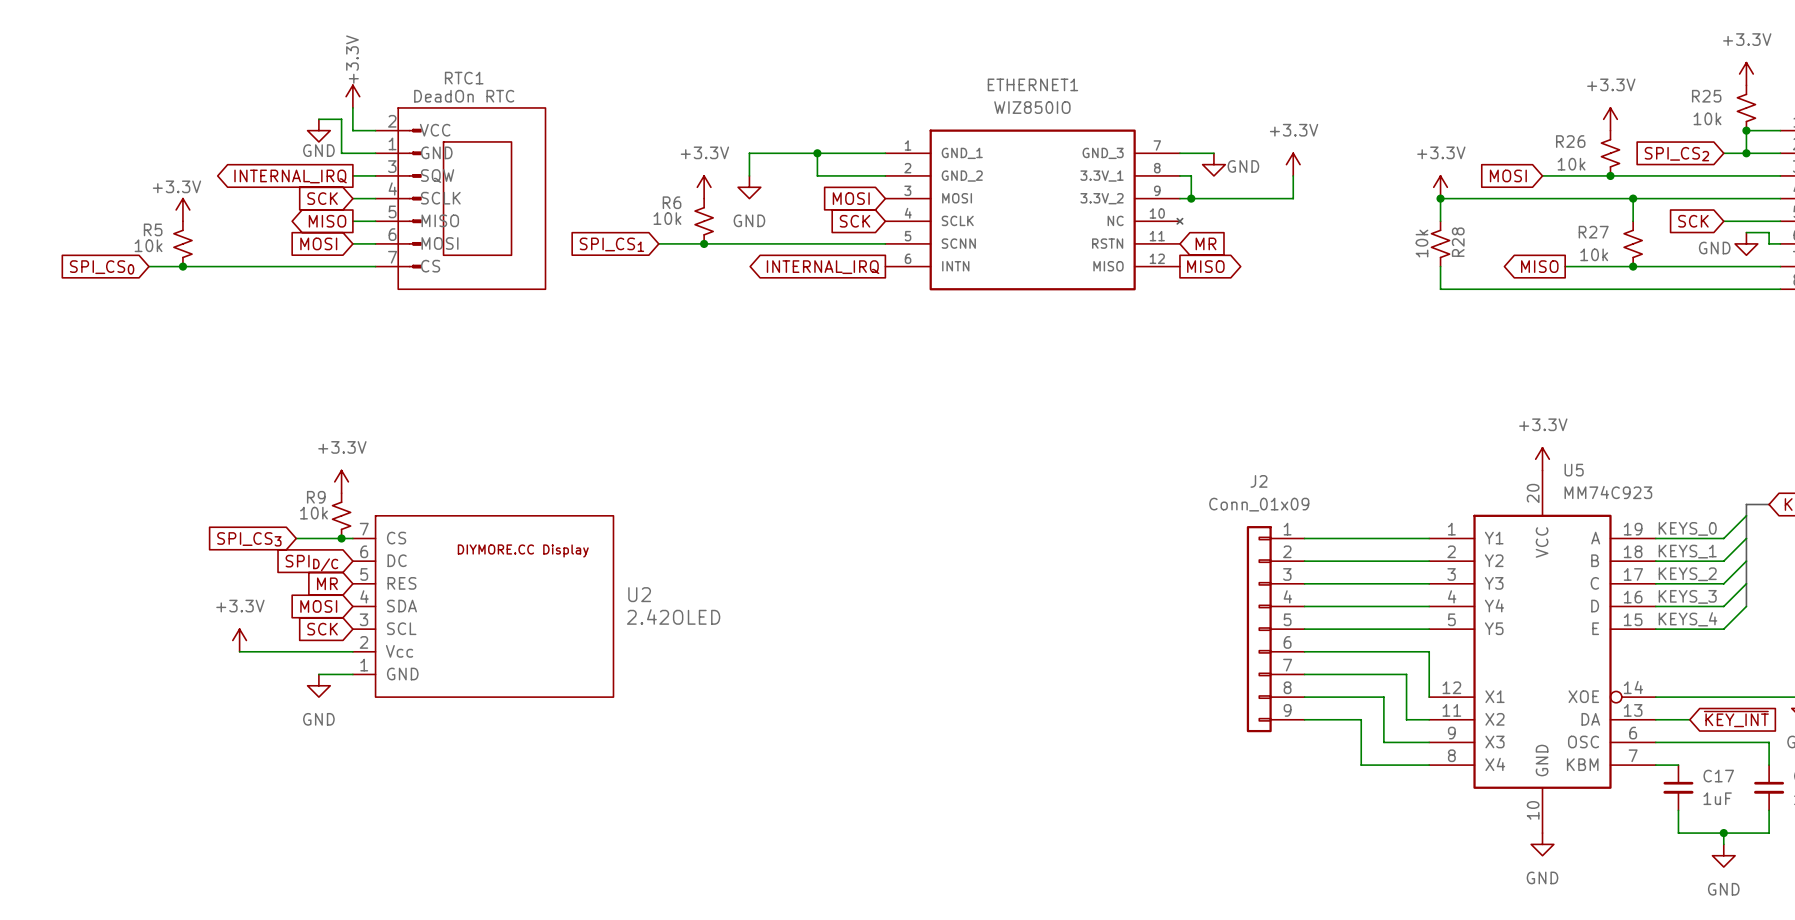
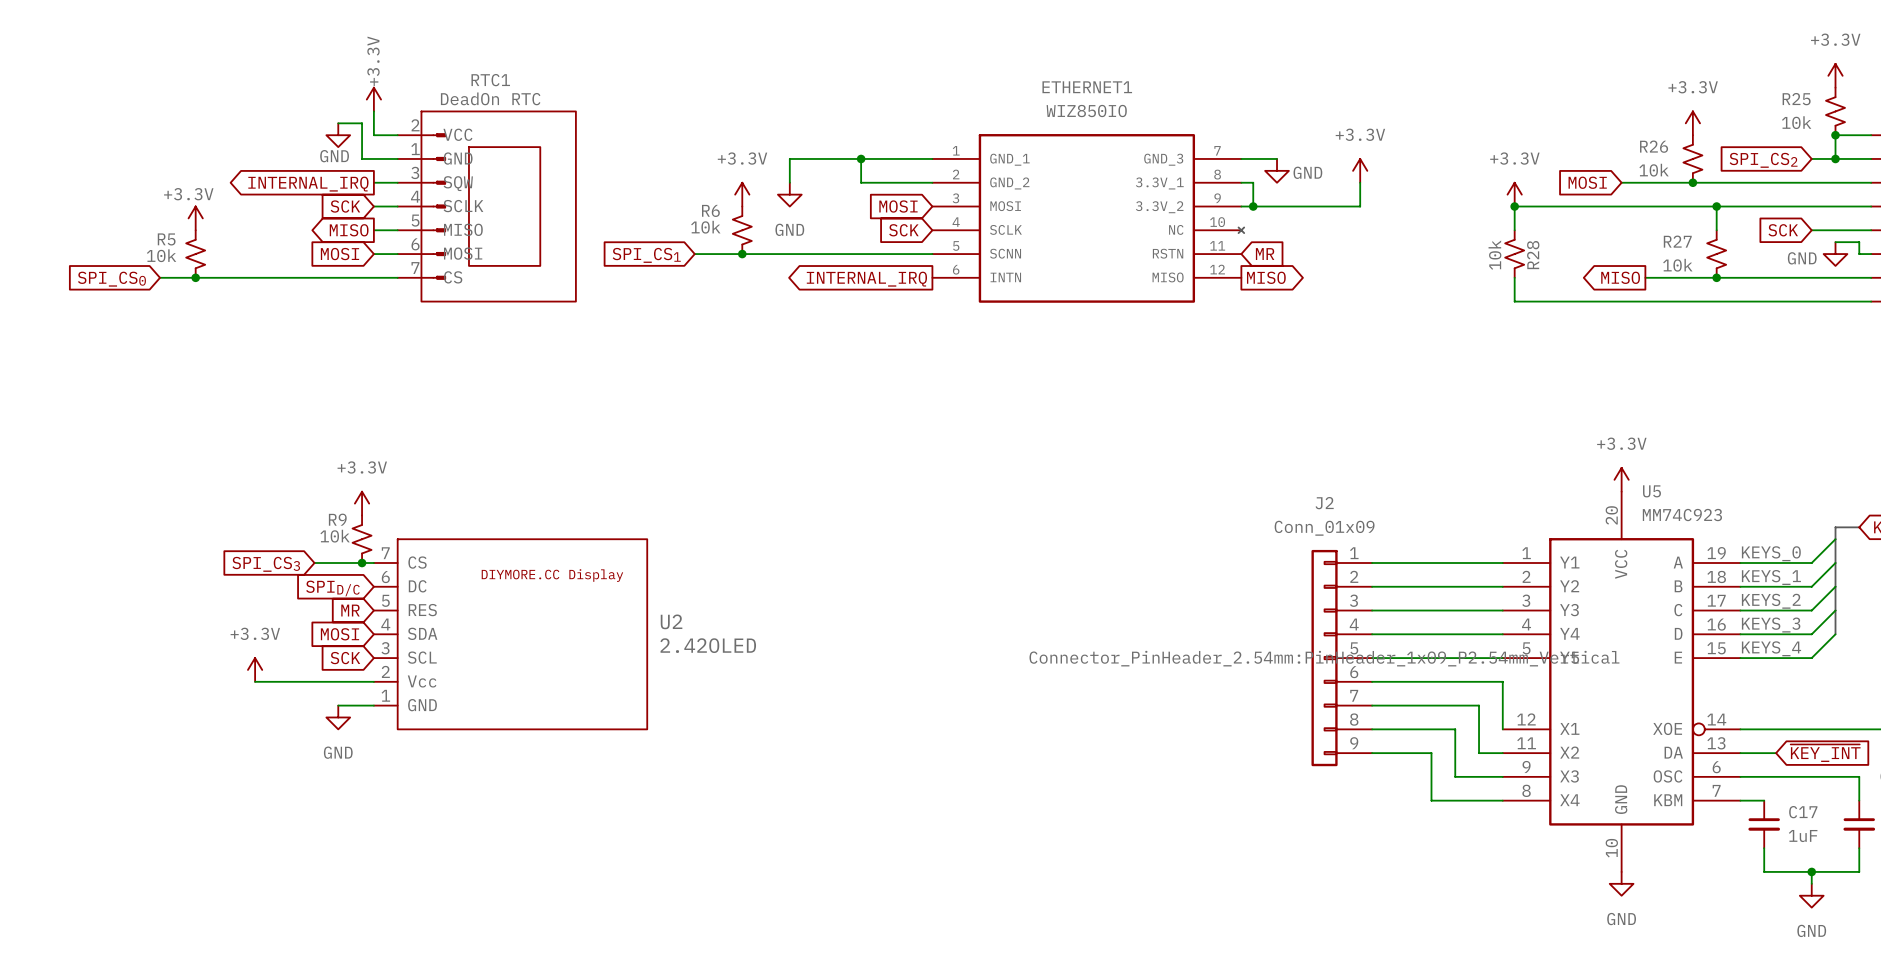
J2 text: none -> Connector_PinHeader_2.54mm:PinHeader_1x09_P2.54mm_Vertical (1324, 658)

